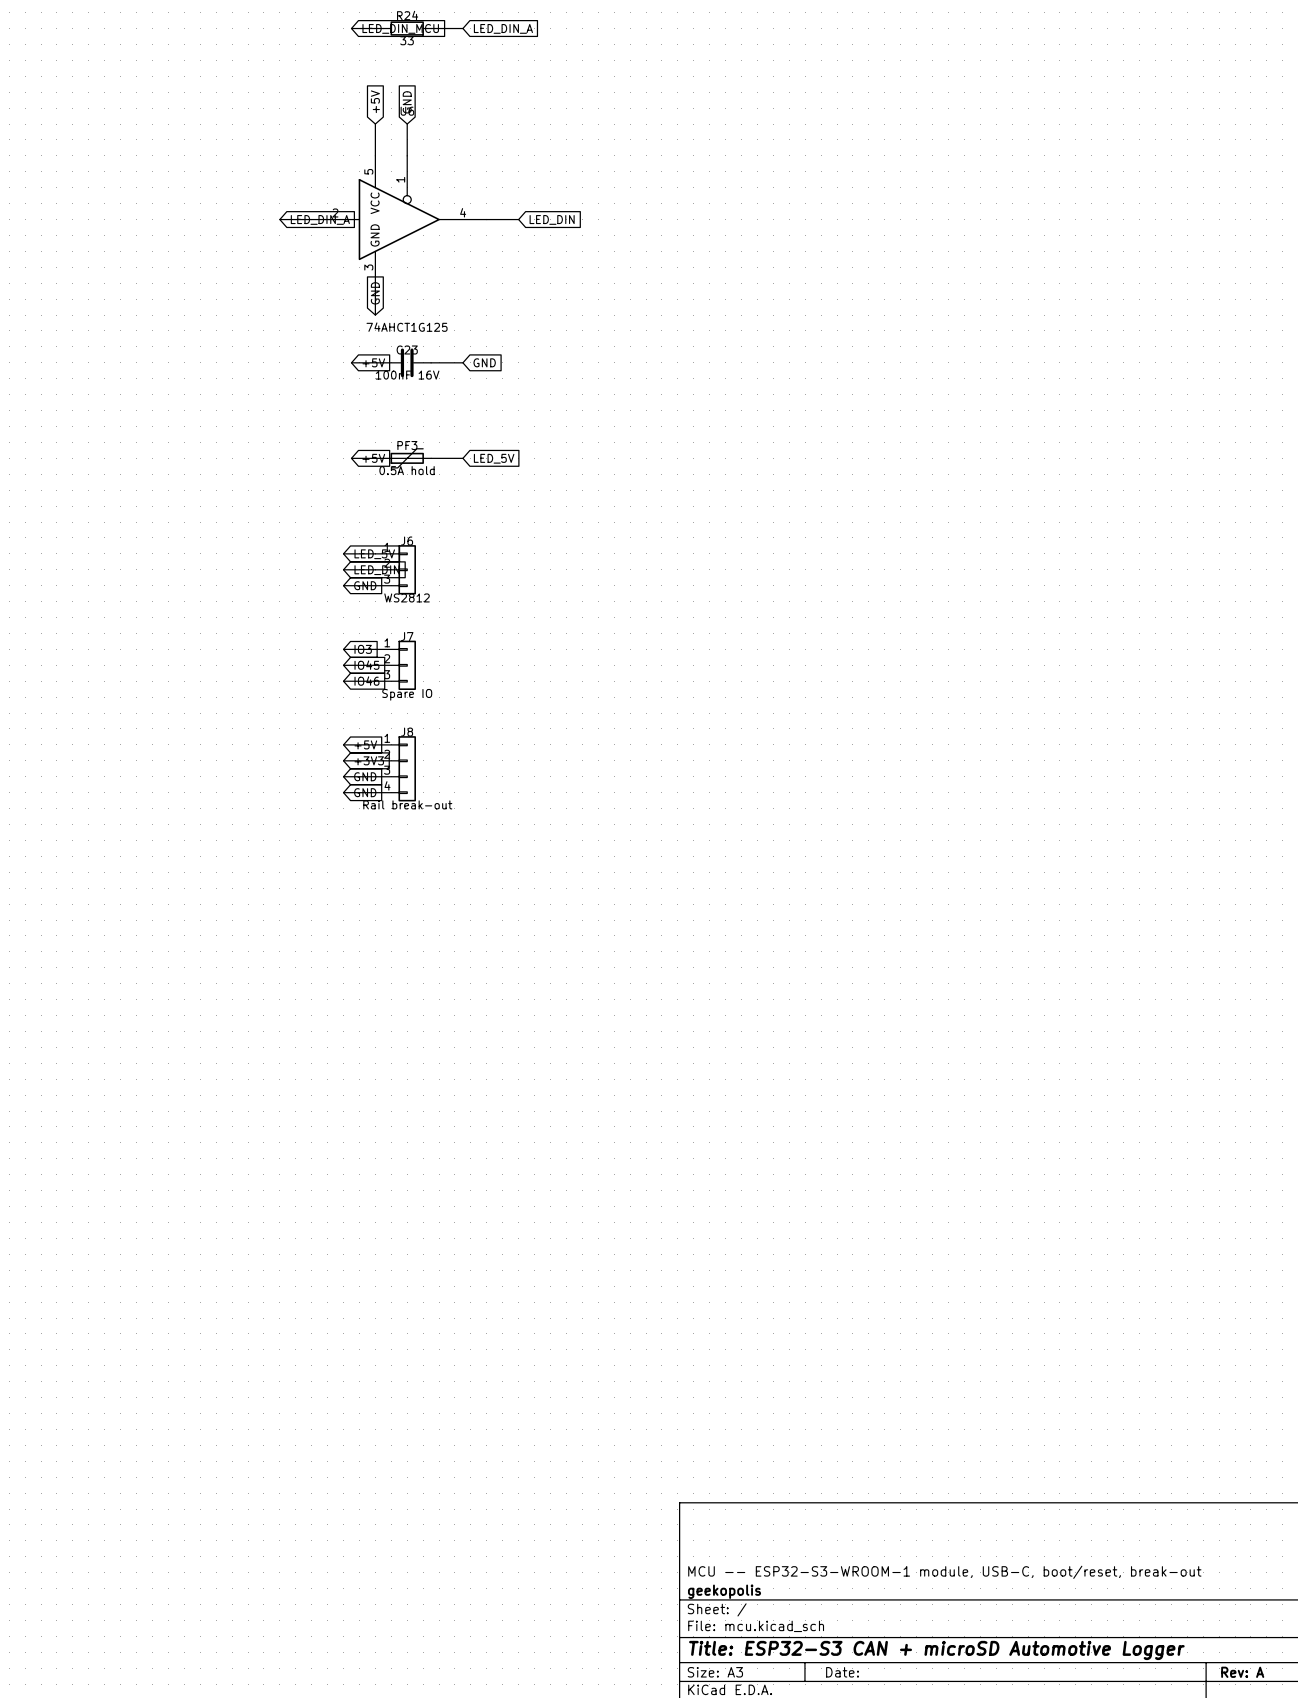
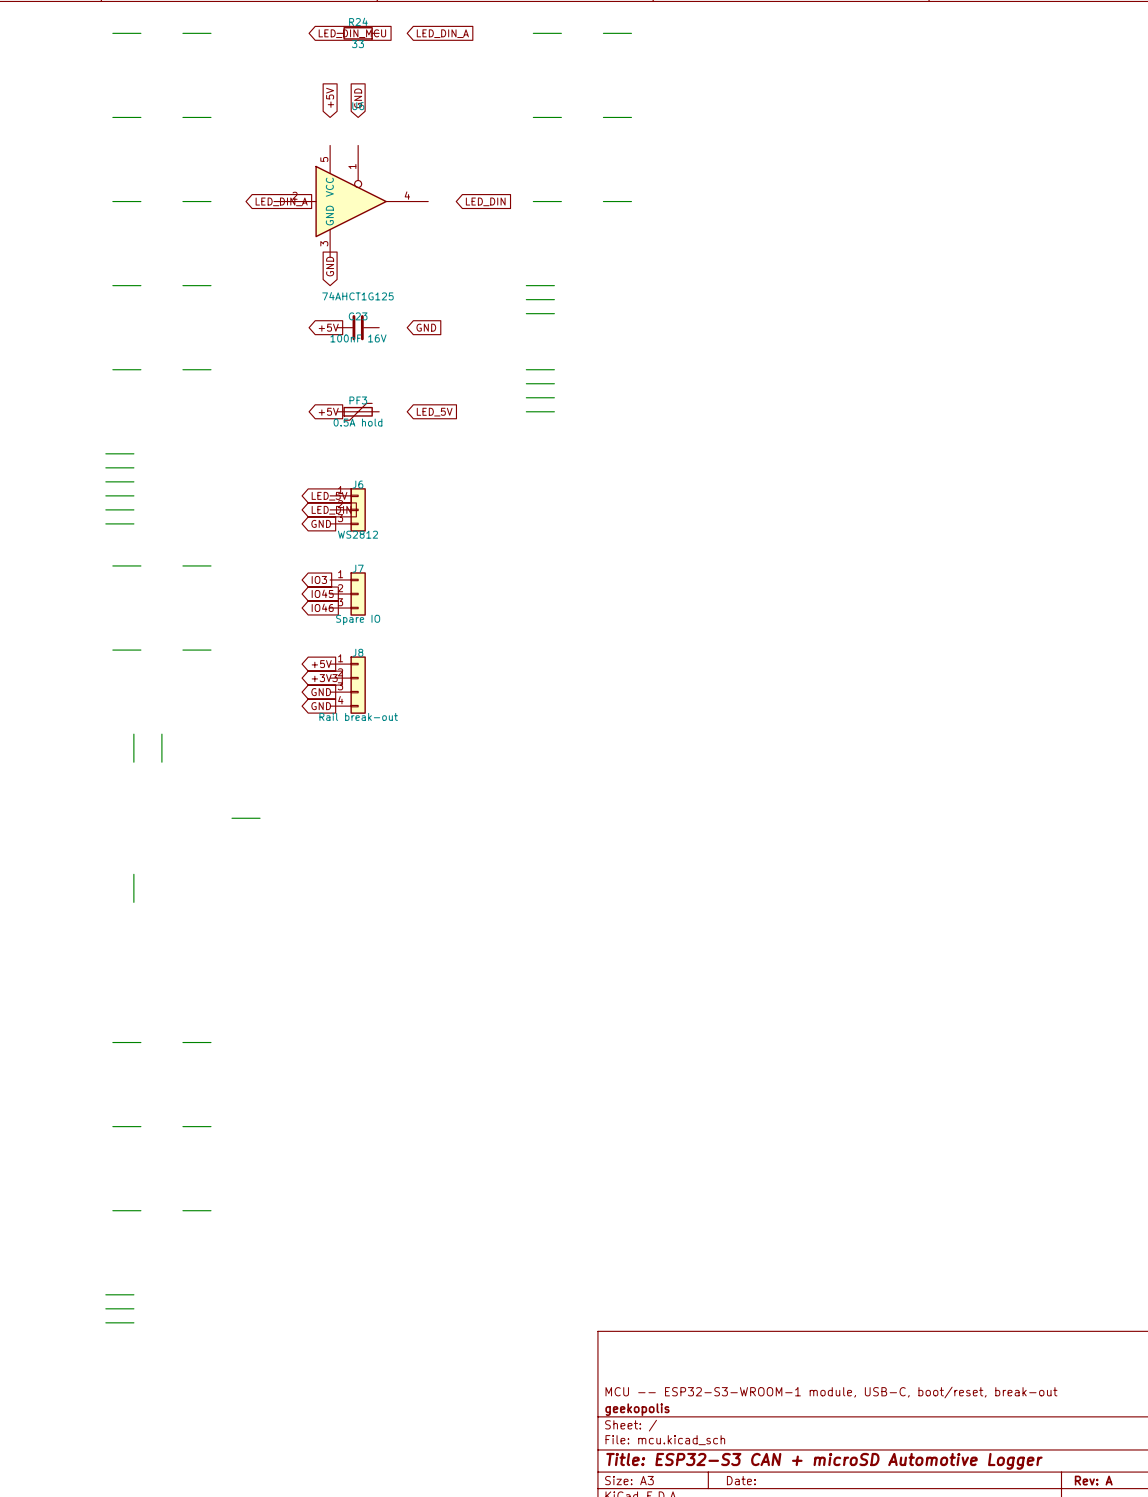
wire: none -> (112, 33) (140, 33)
wire: (351, 28) (383, 28) -> (182, 33) (210, 33)
wire: (431, 28) (462, 28) -> none
wire: none -> (533, 33) (561, 33)
wire: none -> (603, 33) (631, 33)
wire: none -> (112, 117) (140, 117)
wire: none -> (182, 117) (210, 117)
wire: (375, 124) (375, 155) -> none
wire: (407, 124) (407, 155) -> none
wire: none -> (533, 117) (561, 117)
wire: none -> (603, 117) (631, 117)
wire: none -> (112, 201) (140, 201)
wire: (279, 219) (311, 219) -> (182, 201) (210, 201)
wire: (486, 219) (518, 219) -> (533, 201) (561, 201)
wire: none -> (603, 201) (631, 201)
wire: (375, 283) (375, 315) -> none
wire: none -> (112, 285) (140, 285)
wire: none -> (526, 285) (554, 285)
wire: none -> (526, 299) (554, 299)
wire: none -> (526, 313) (554, 313)
wire: (351, 362) (383, 362) -> (182, 285) (210, 285)
wire: (431, 362) (462, 362) -> none
wire: none -> (112, 369) (140, 369)
wire: none -> (526, 369) (554, 369)
wire: none -> (526, 383) (554, 383)
wire: none -> (526, 397) (554, 397)
wire: (351, 458) (383, 458) -> (182, 369) (210, 369)
wire: (431, 458) (462, 458) -> none
wire: none -> (526, 411) (554, 411)
wire: none -> (105, 453) (133, 453)
wire: none -> (105, 467) (133, 467)
wire: none -> (105, 481) (133, 481)
wire: none -> (105, 495) (133, 495)
wire: (343, 553) (375, 553) -> none
wire: none -> (105, 509) (133, 509)
wire: (343, 569) (375, 569) -> none
wire: none -> (105, 523) (133, 523)
wire: (343, 585) (375, 585) -> none
wire: none -> (112, 565) (140, 565)
wire: (343, 649) (375, 649) -> (182, 565) (210, 565)
wire: (343, 665) (375, 665) -> none
wire: (343, 681) (375, 681) -> none
wire: none -> (112, 650) (140, 650)
wire: (343, 744) (375, 744) -> (182, 650) (210, 650)
wire: (343, 760) (375, 760) -> none
wire: (343, 776) (375, 776) -> none
wire: (343, 792) (375, 792) -> (232, 818) (260, 818)
wire: none -> (133, 734) (133, 762)
wire: none -> (161, 734) (161, 762)
wire: none -> (133, 874) (133, 902)
wire: none -> (112, 1042) (140, 1042)
wire: none -> (182, 1042) (210, 1042)
wire: none -> (112, 1126) (140, 1126)
wire: none -> (182, 1126) (210, 1126)
wire: none -> (112, 1210) (140, 1210)
wire: none -> (182, 1210) (210, 1210)
wire: none -> (105, 1294) (133, 1294)
wire: none -> (105, 1308) (133, 1308)
wire: none -> (105, 1322) (133, 1322)

